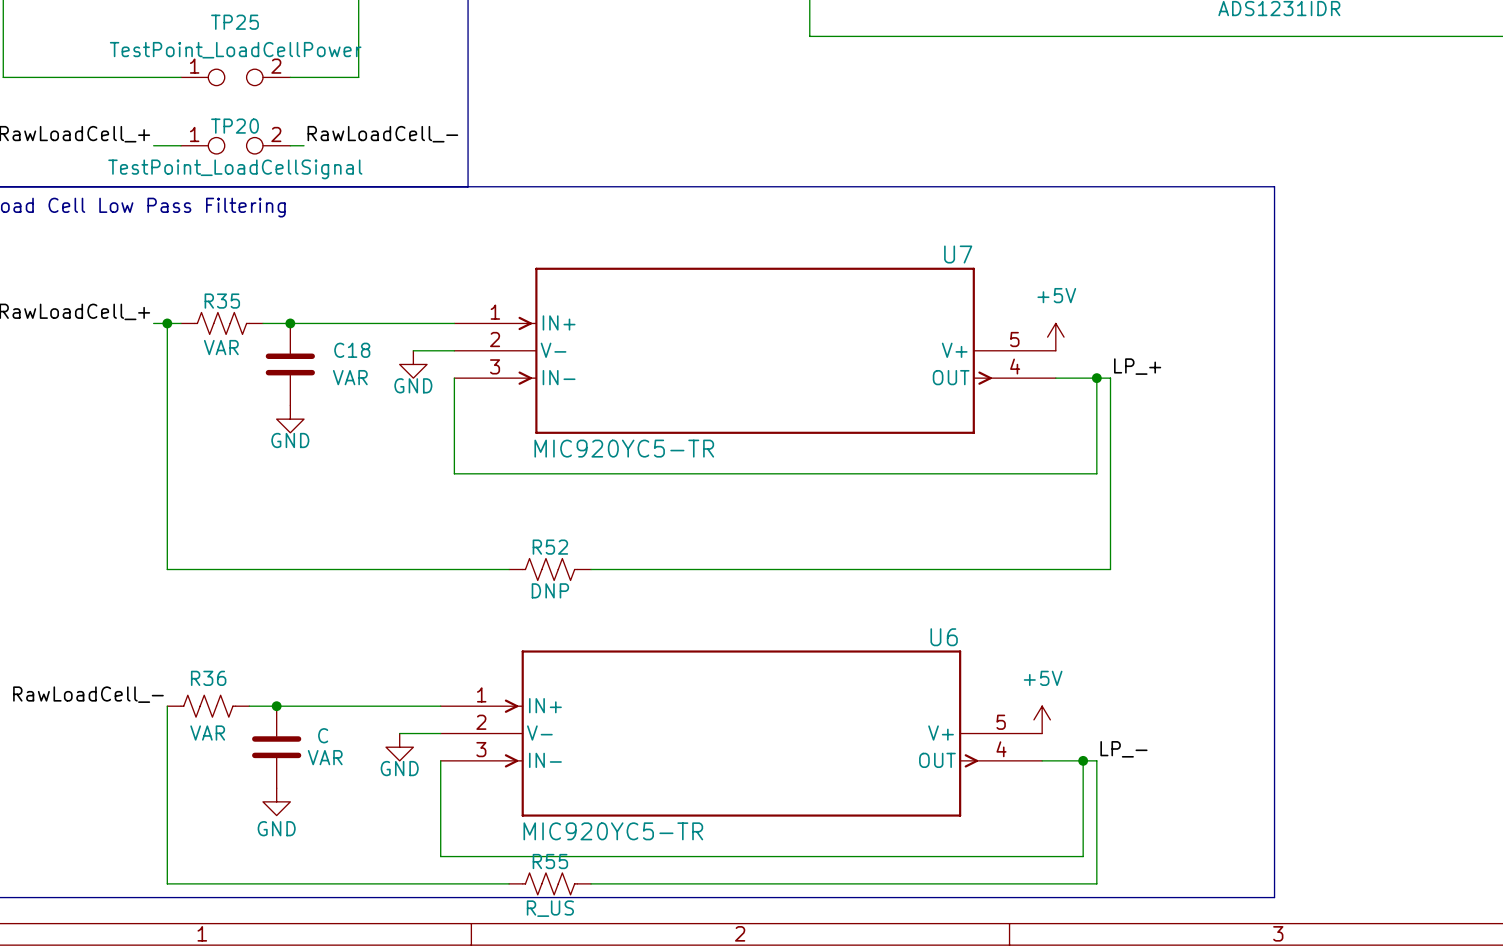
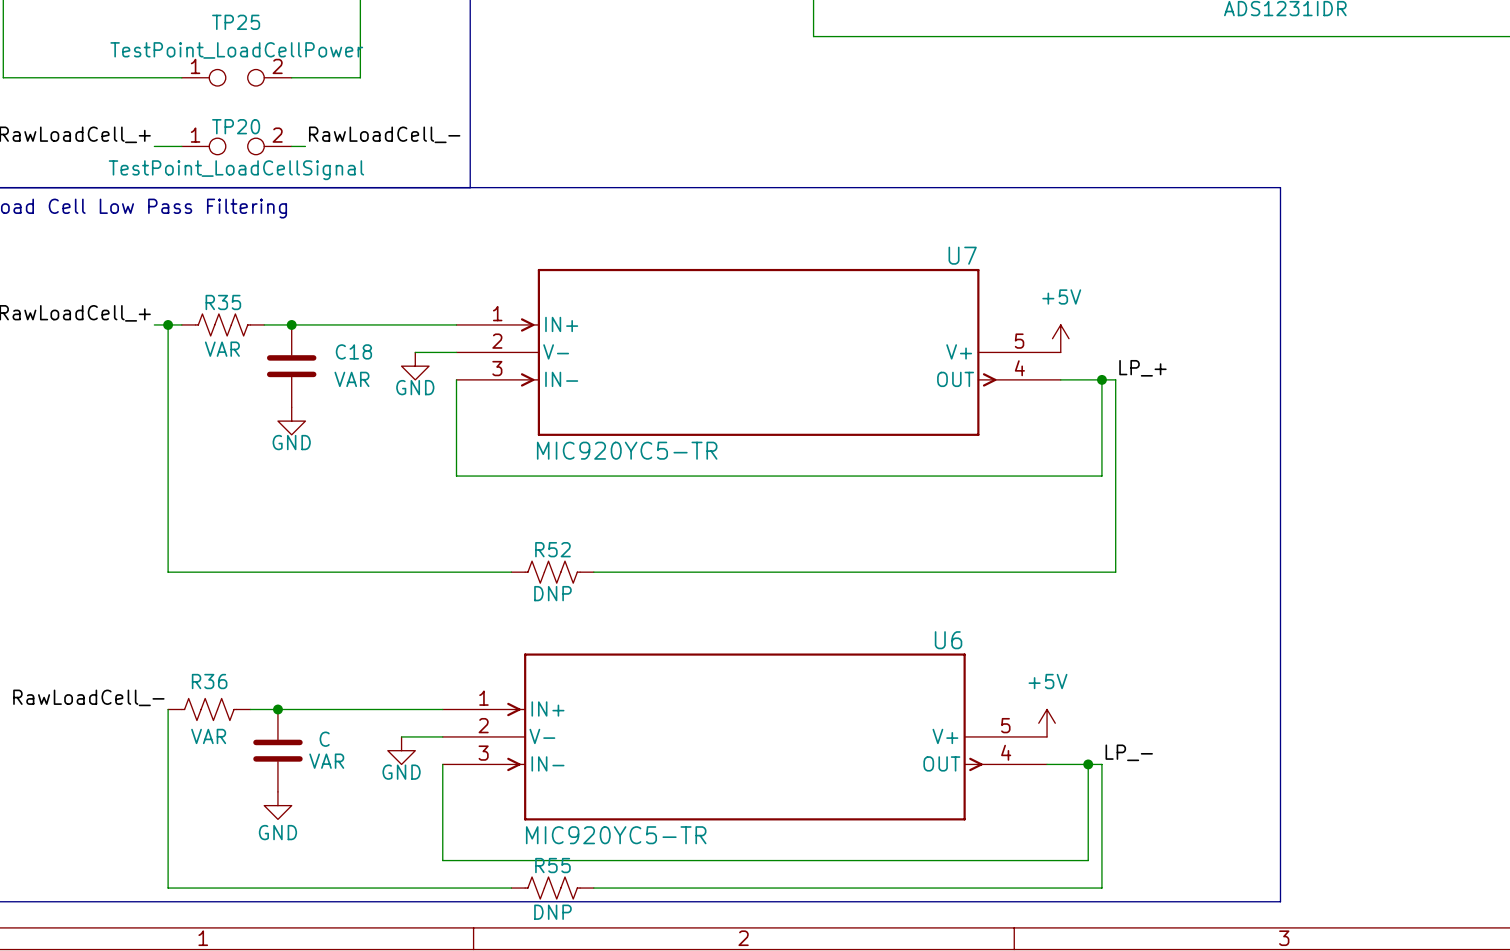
R55 value: R_US (550, 908) -> DNP (552, 912)

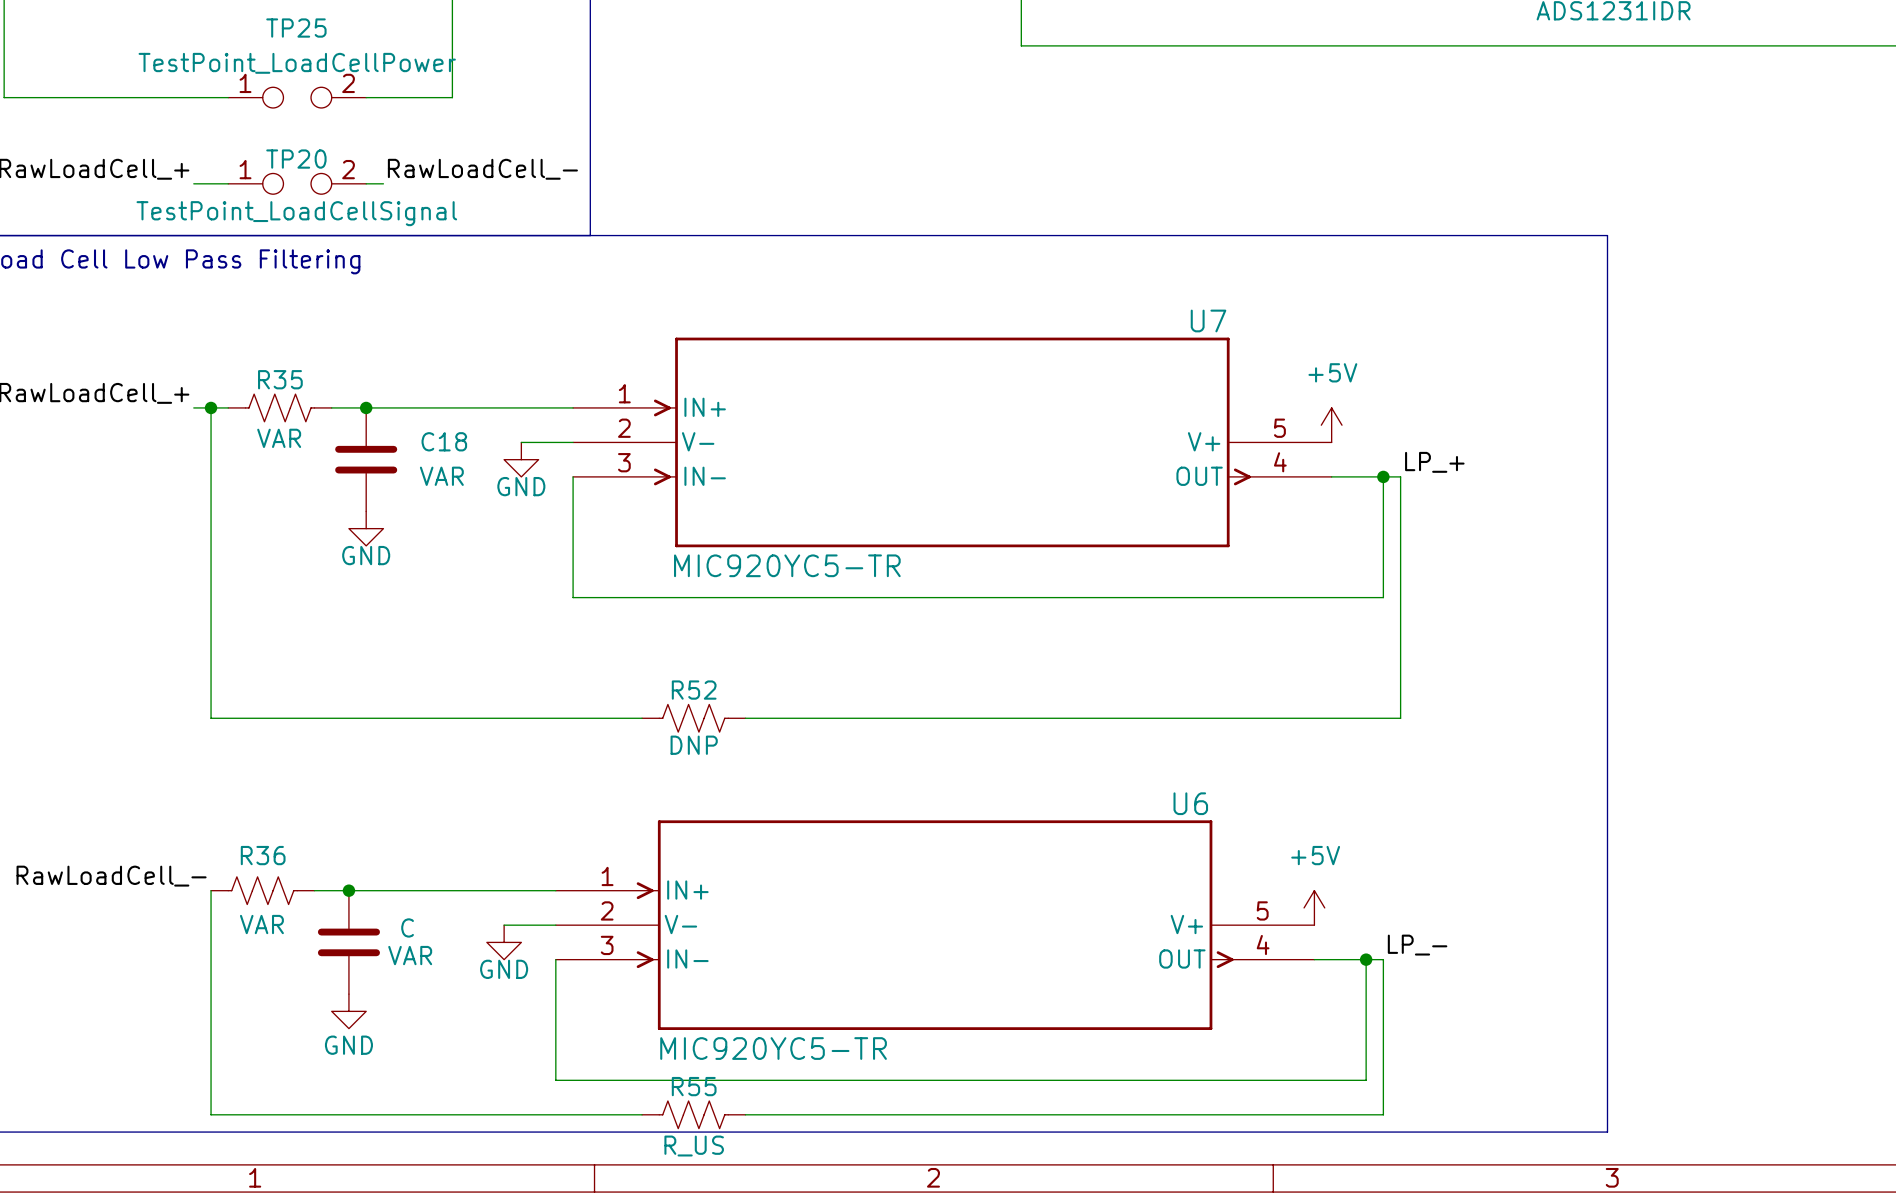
R55 value: DNP (552, 912) -> R_US (694, 1146)

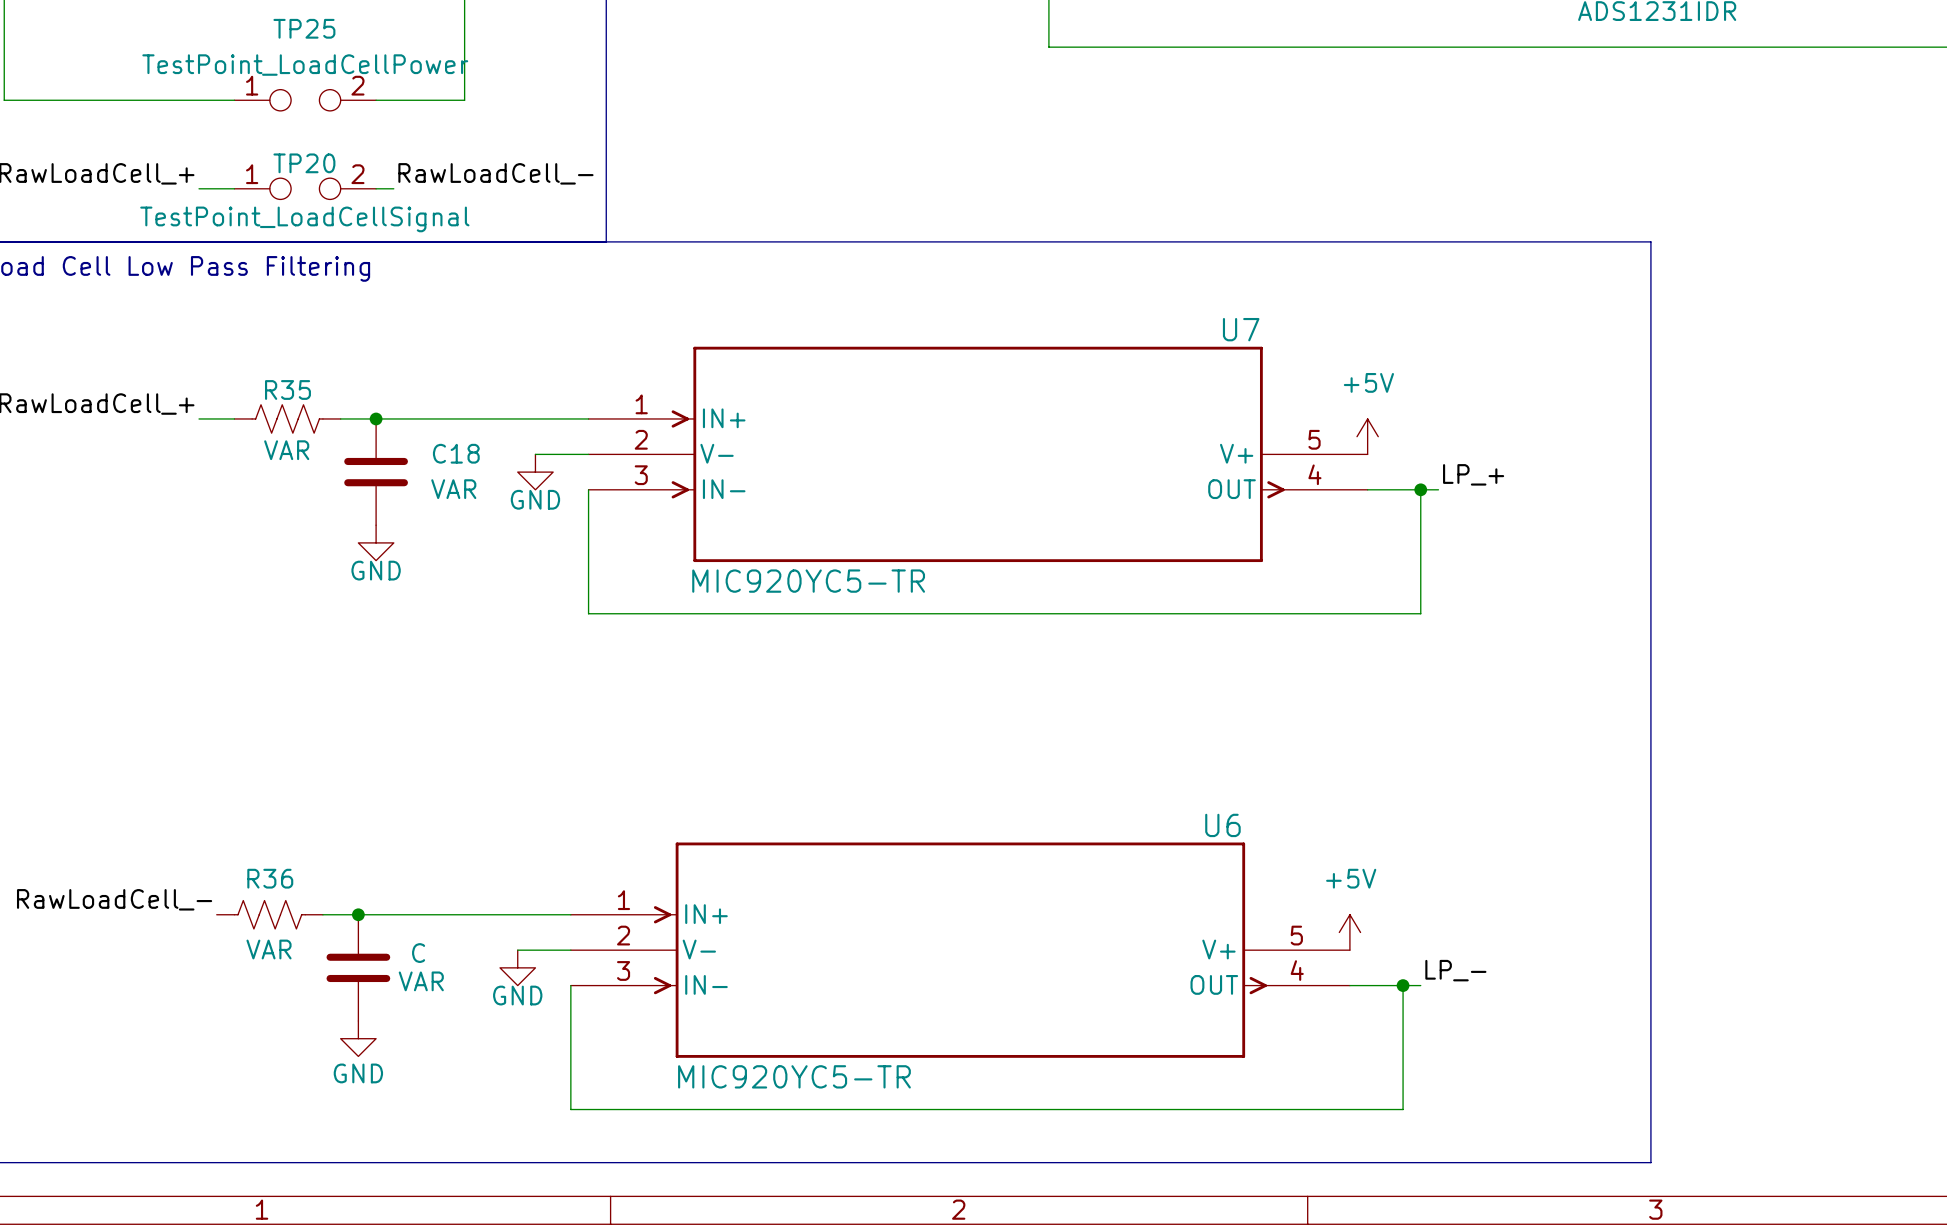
wire: (211, 407) (211, 718) (642, 718) -> none
junction: (211, 407) -> none
wire: (1400, 476) (1400, 718) (745, 718) -> none
R52: DNP (693, 718) -> none
wire: (211, 890) (211, 1114) (642, 1114) -> none
wire: (1383, 959) (1383, 1114) (745, 1114) -> none
R55: R_US (693, 1114) -> none

